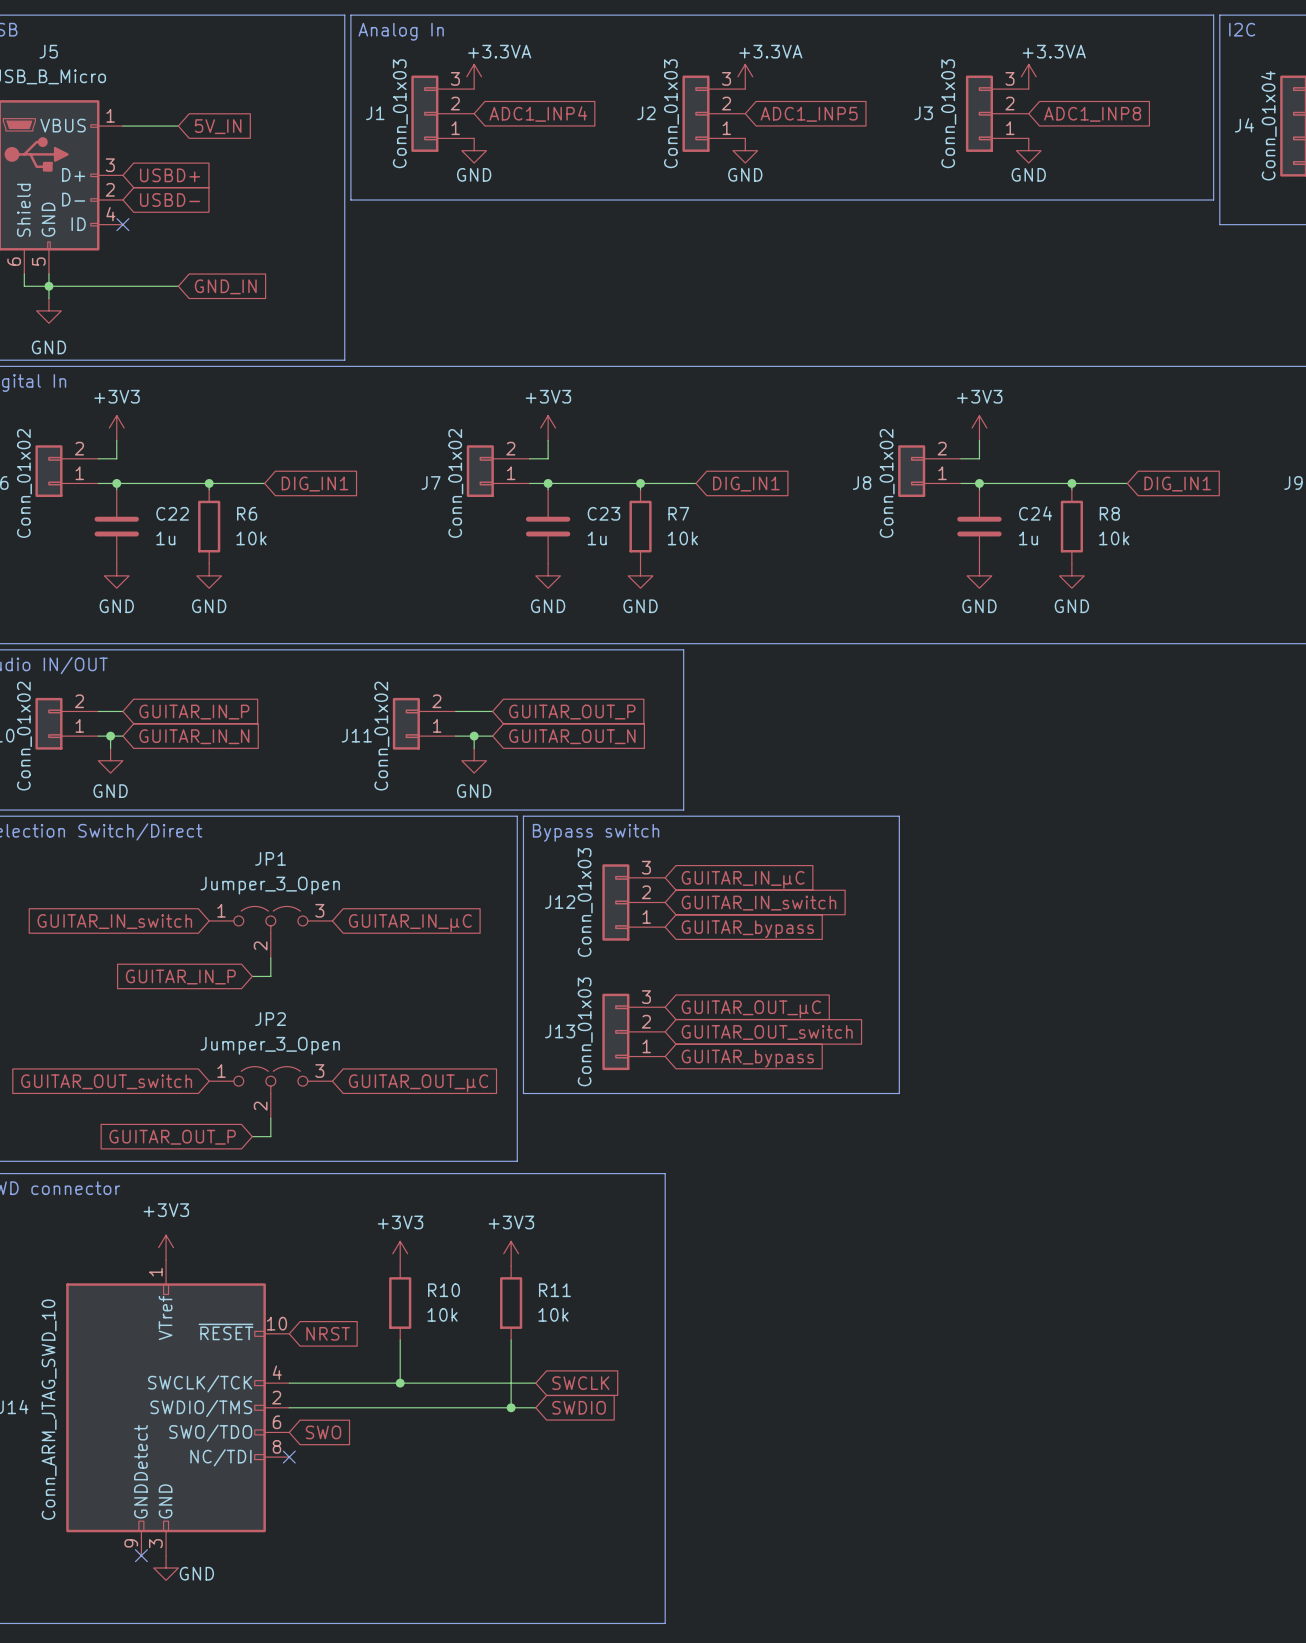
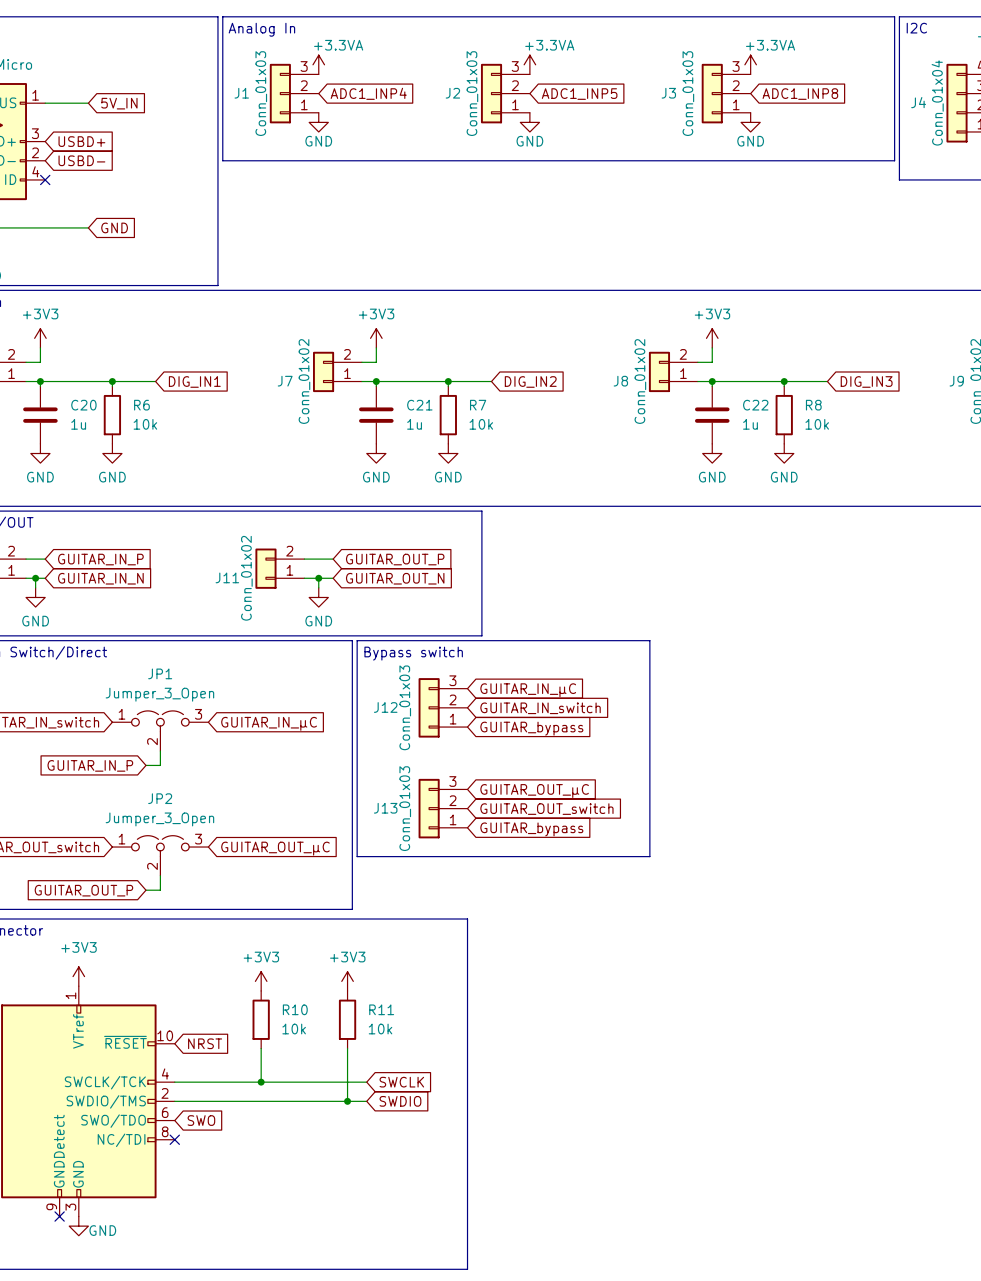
global label: GND_IN (225, 286) -> GND (114, 227)
global label: DIG_IN1 (746, 484) -> DIG_IN2 (530, 381)
global label: DIG_IN1 (1177, 484) -> DIG_IN3 (866, 381)
C22 name: C22 (172, 513) -> C20 (83, 405)
C23 name: C23 (603, 513) -> C21 (419, 405)
C24 name: C24 (1035, 513) -> C22 (755, 405)

